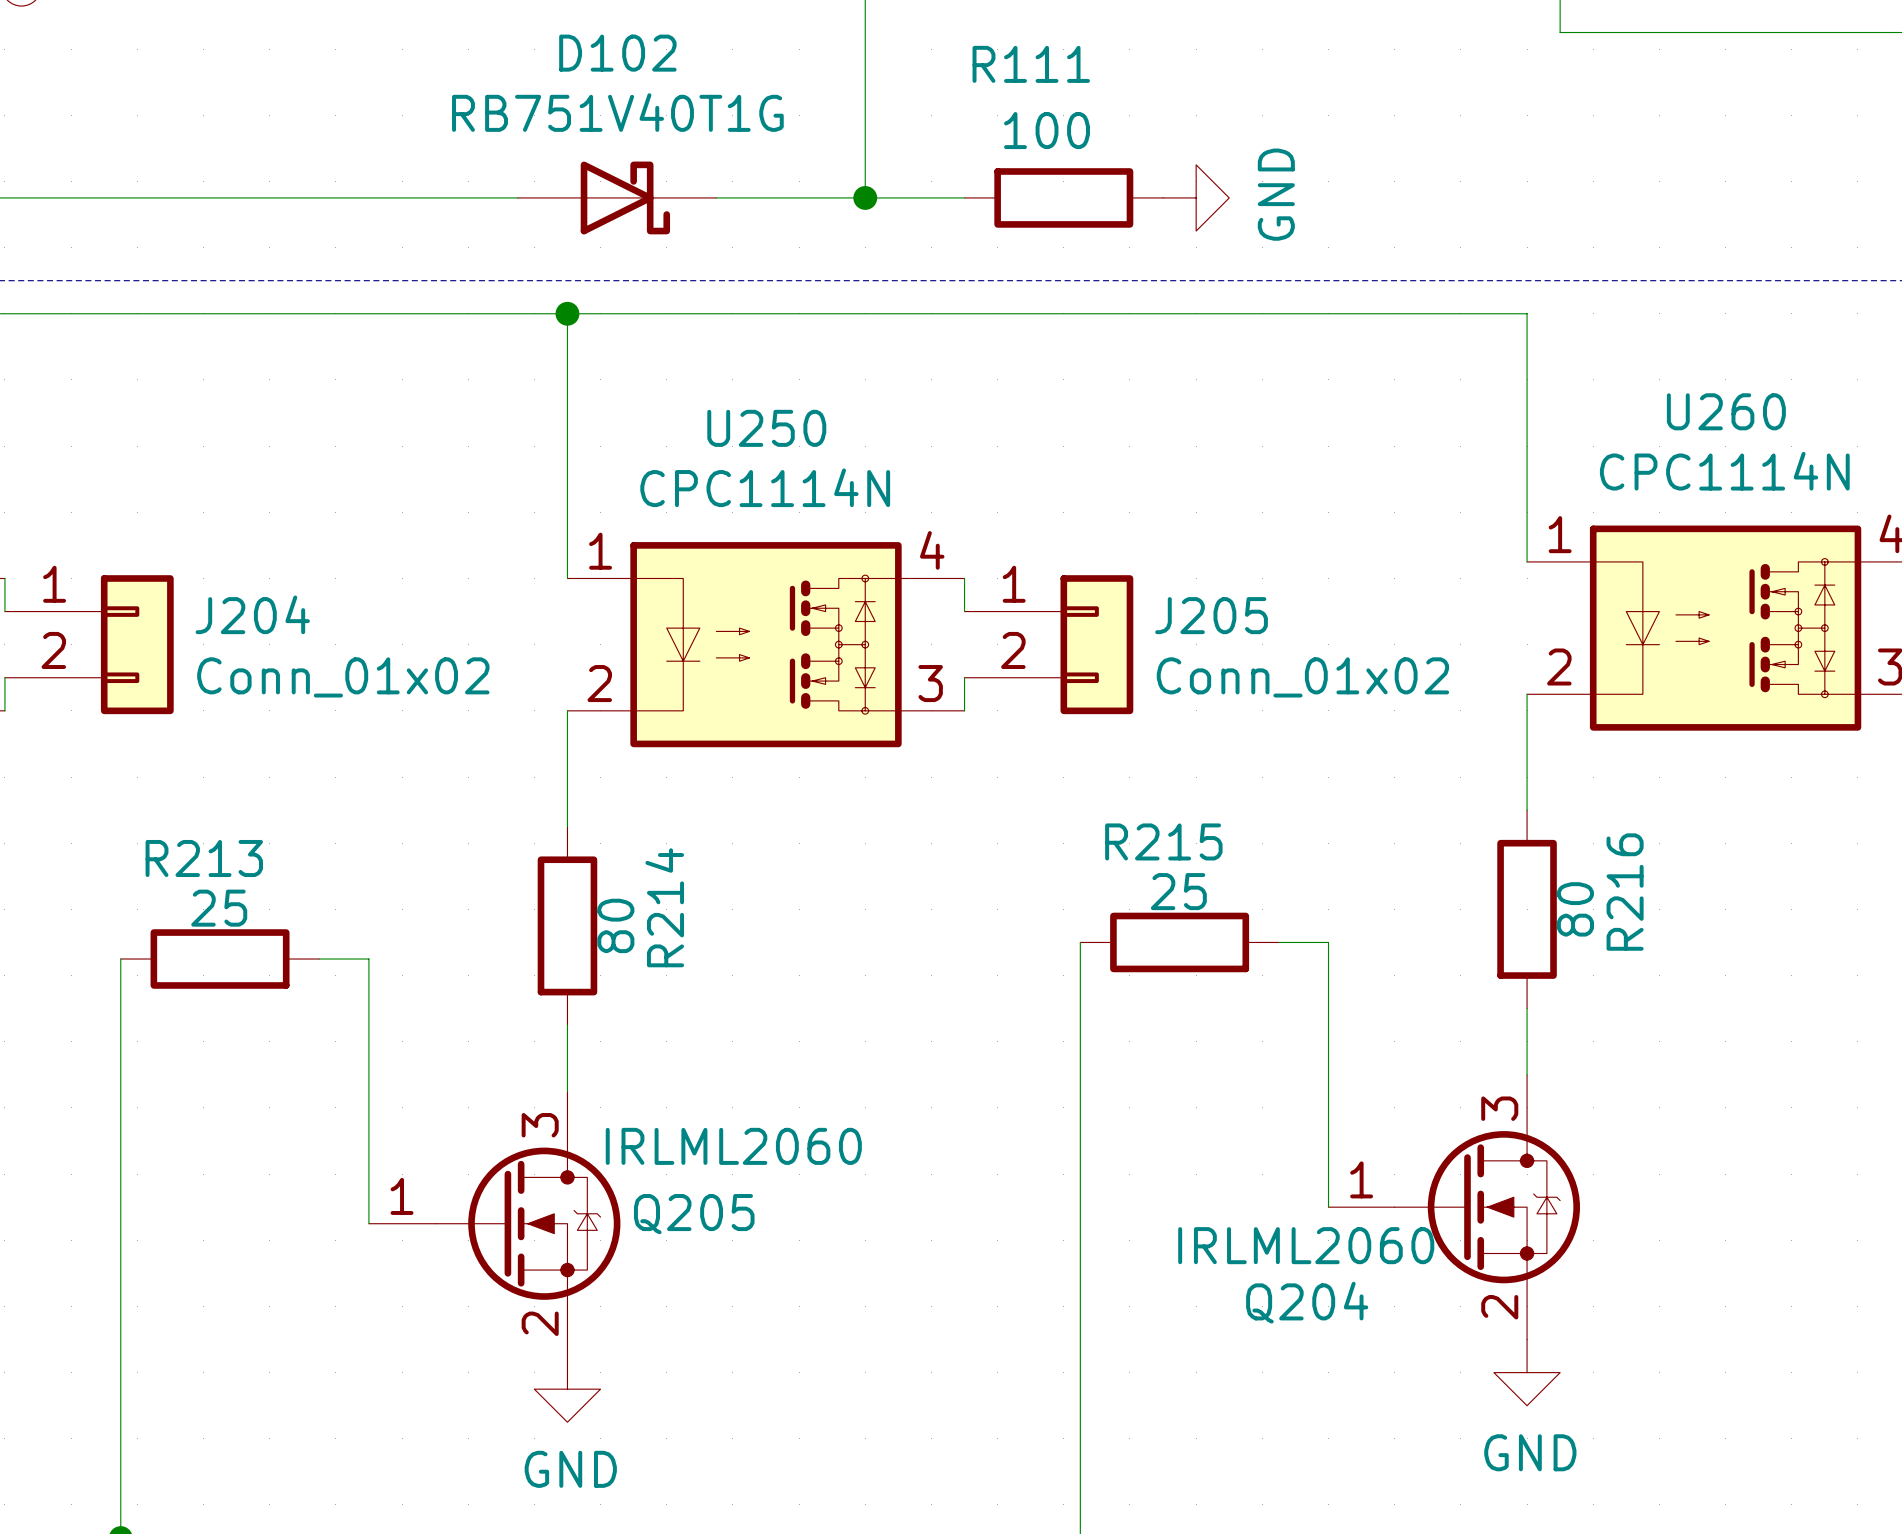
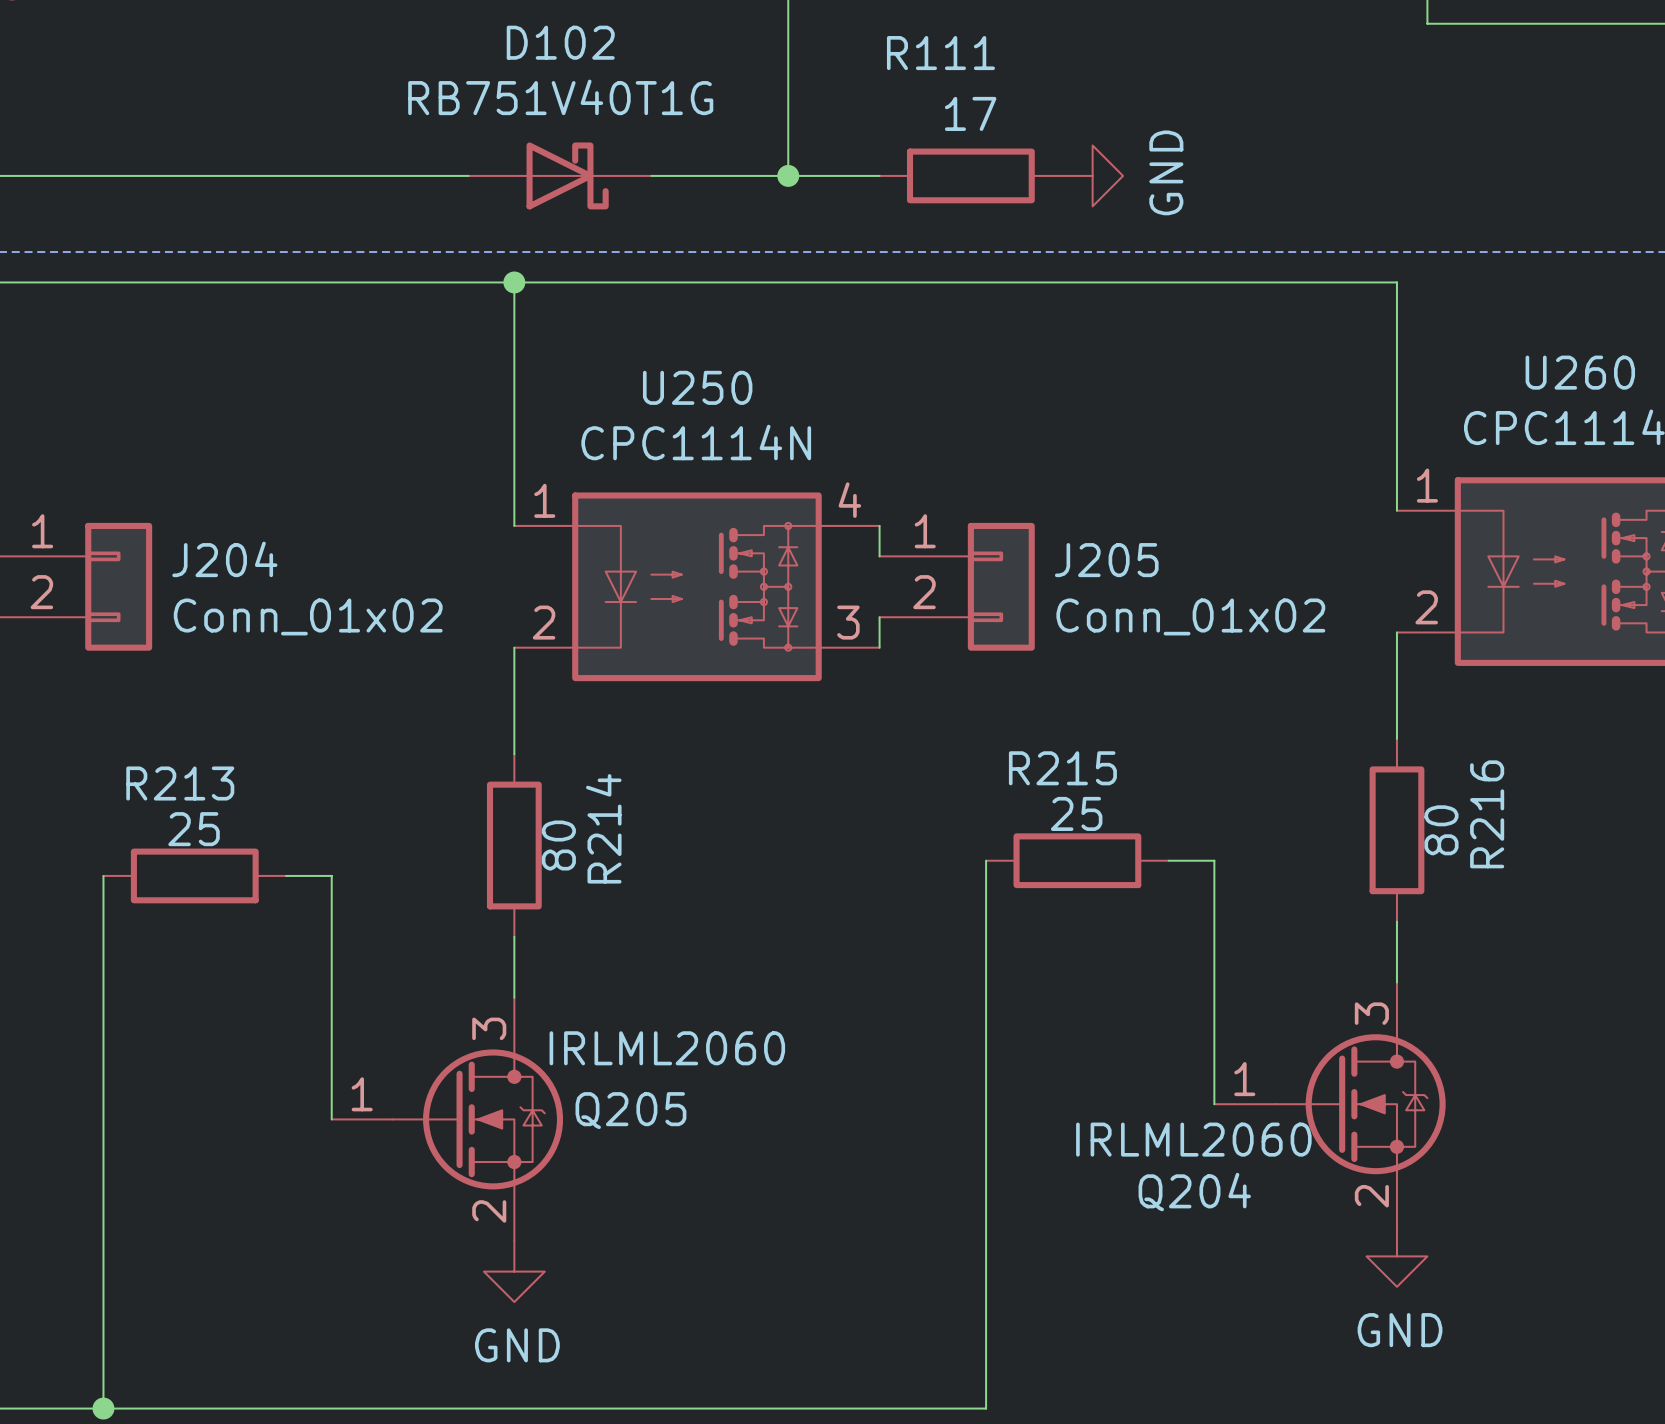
R111 value: 100 (1047, 130) -> 17 (970, 113)

